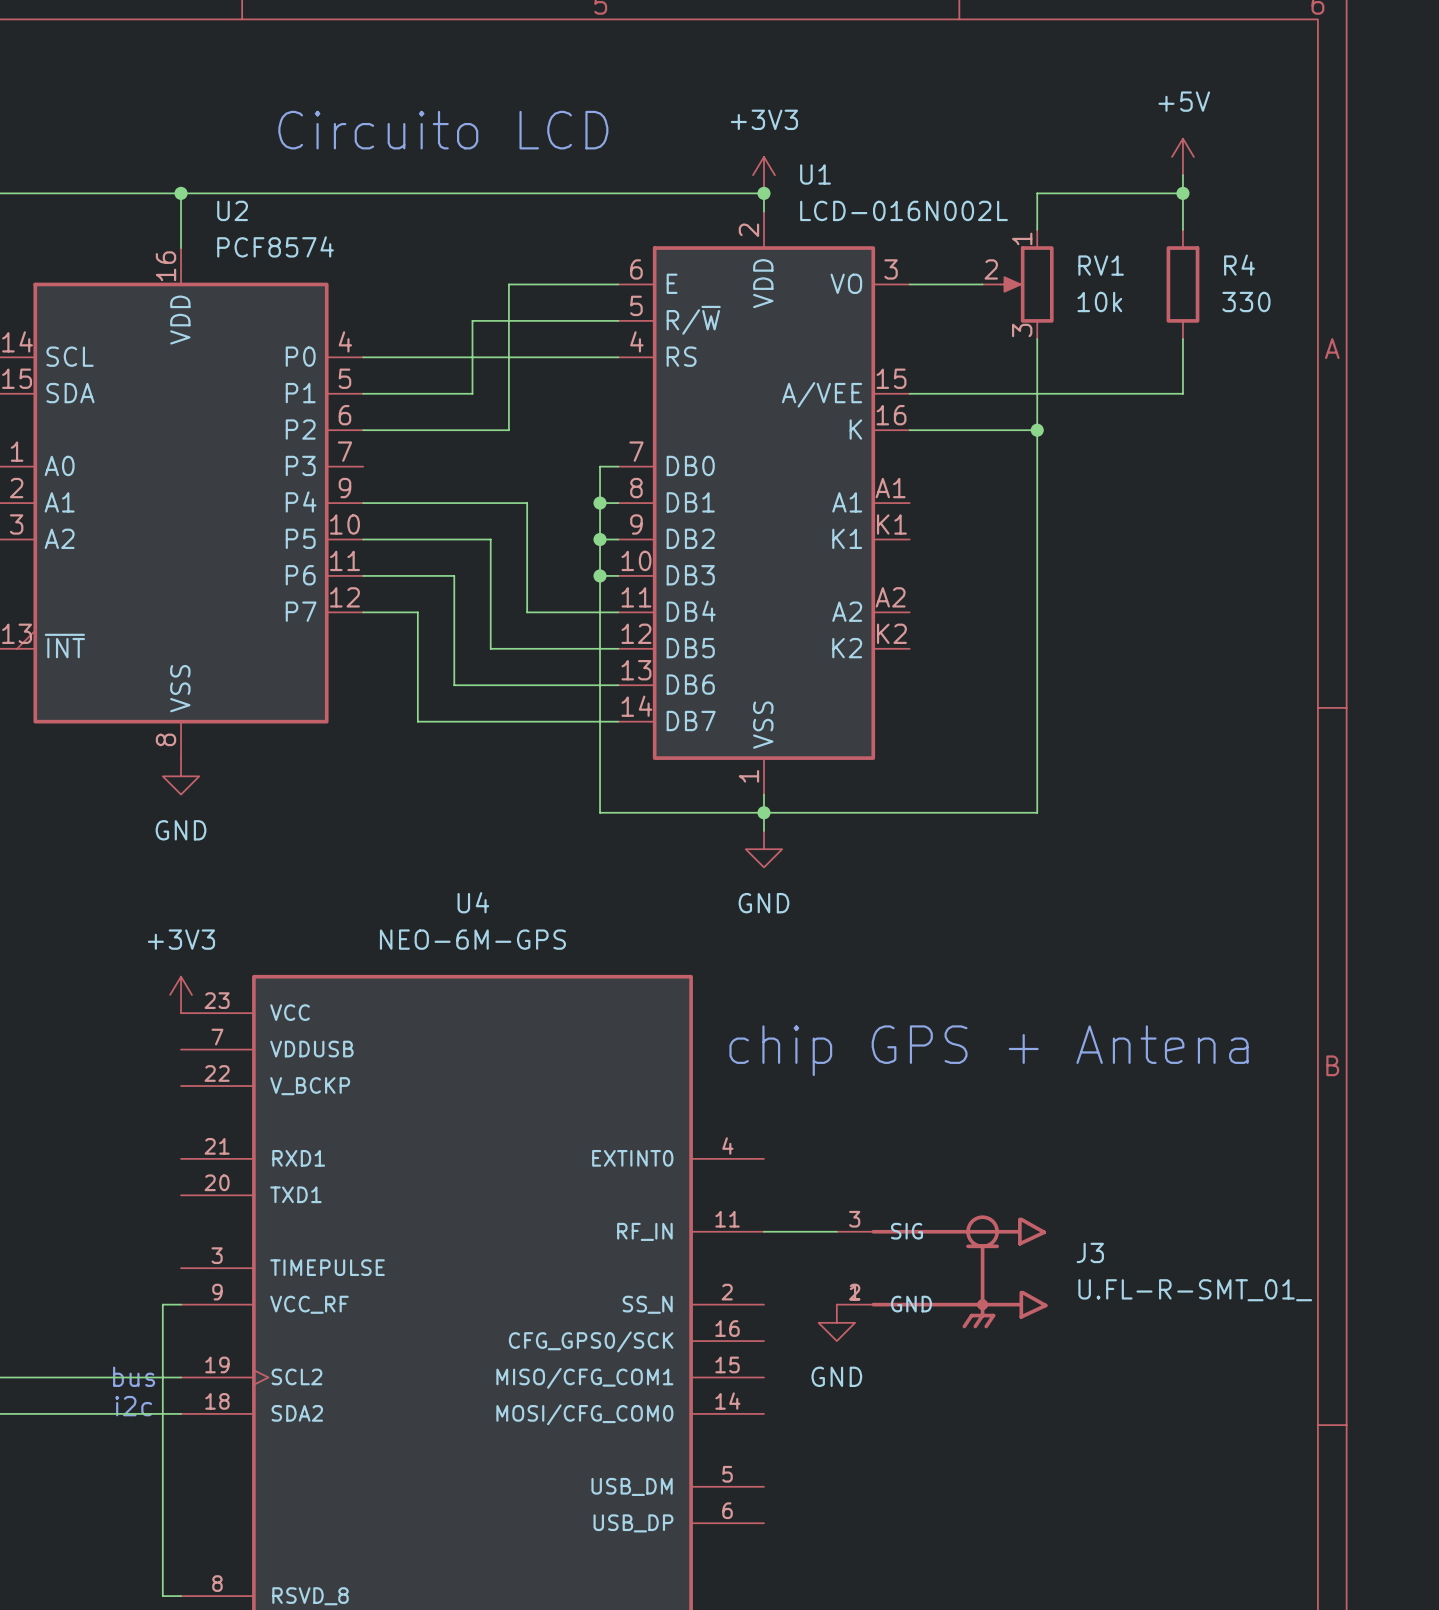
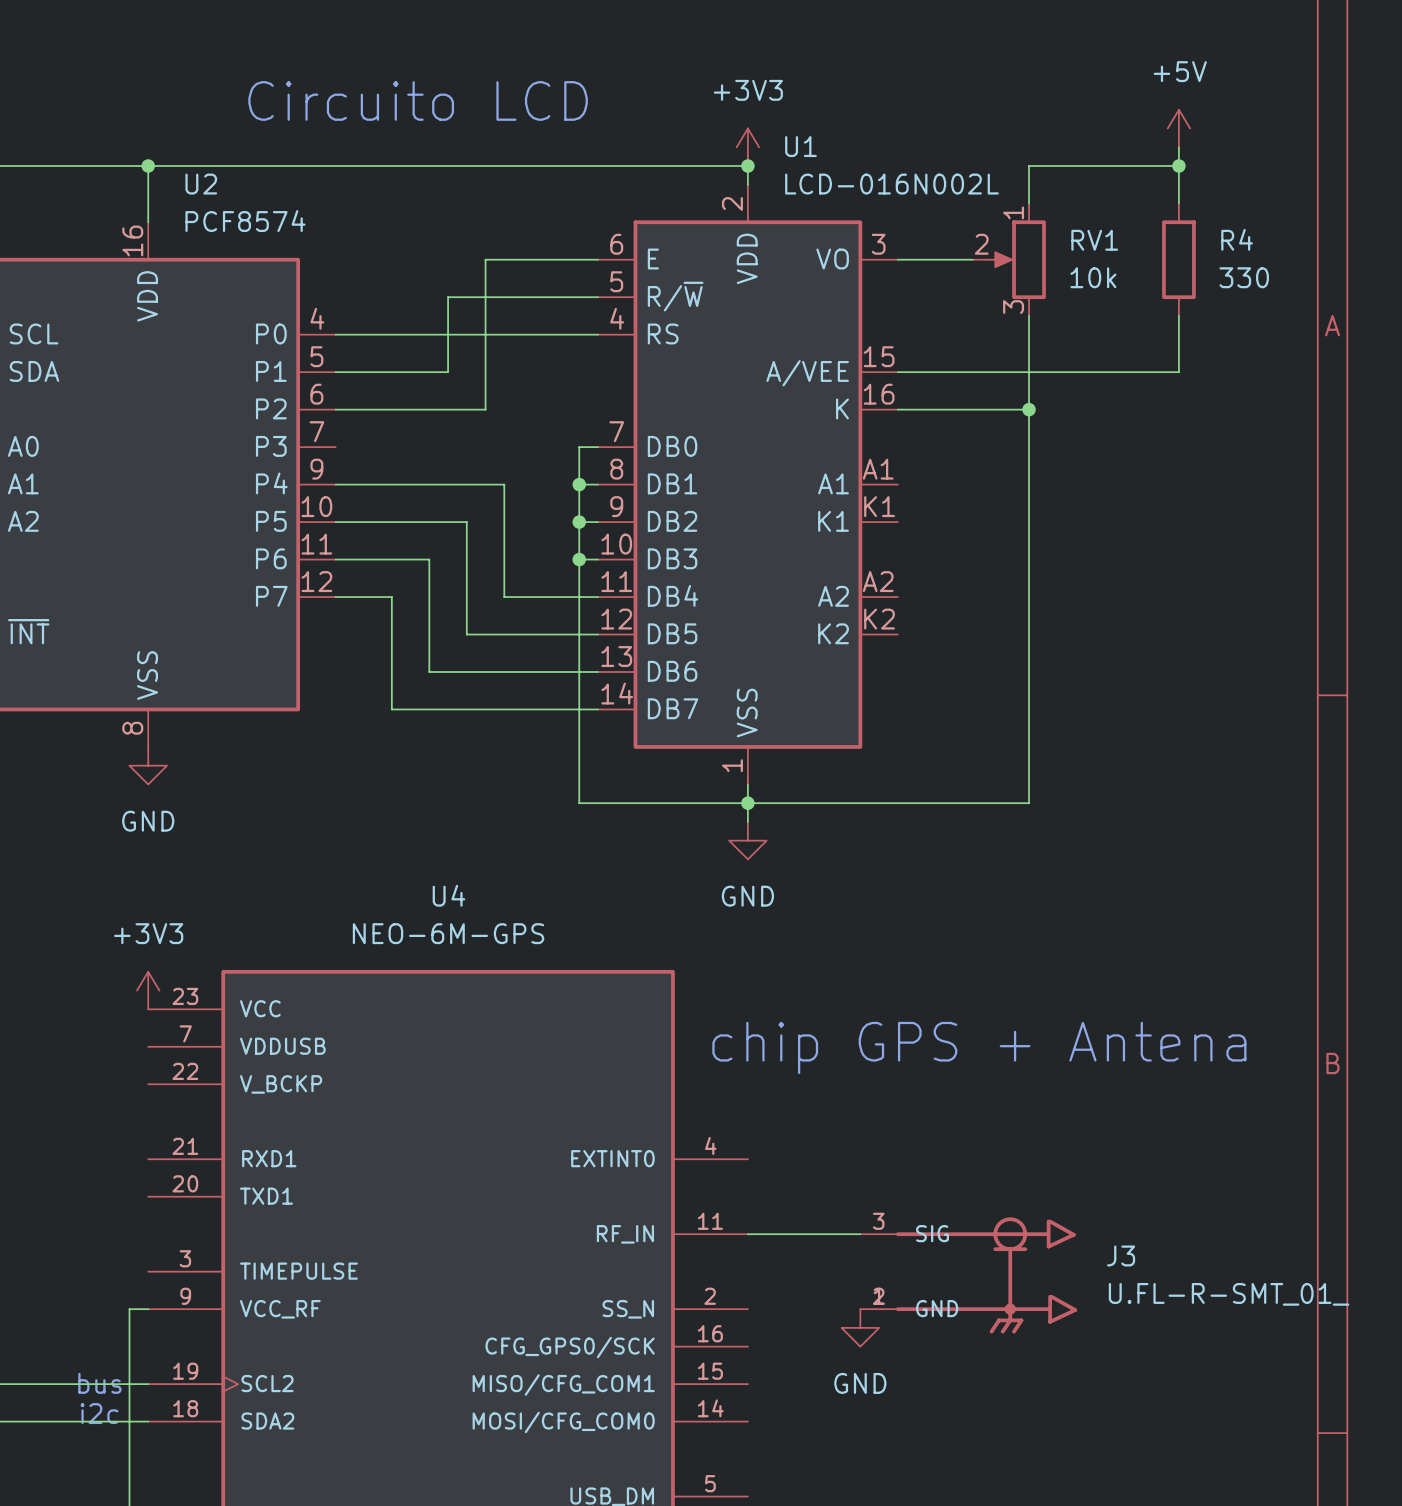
J3 position: (942, 1271) -> (968, 1275)
power symbol position: GND (836, 1322) -> GND (860, 1327)

